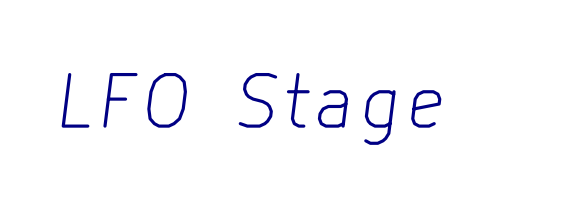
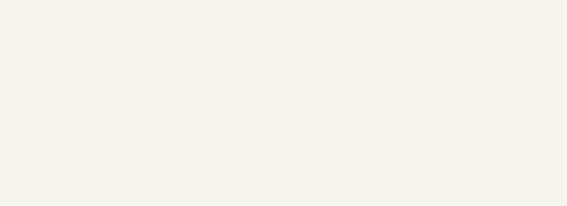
text: LFO Stage (251, 108) -> none

